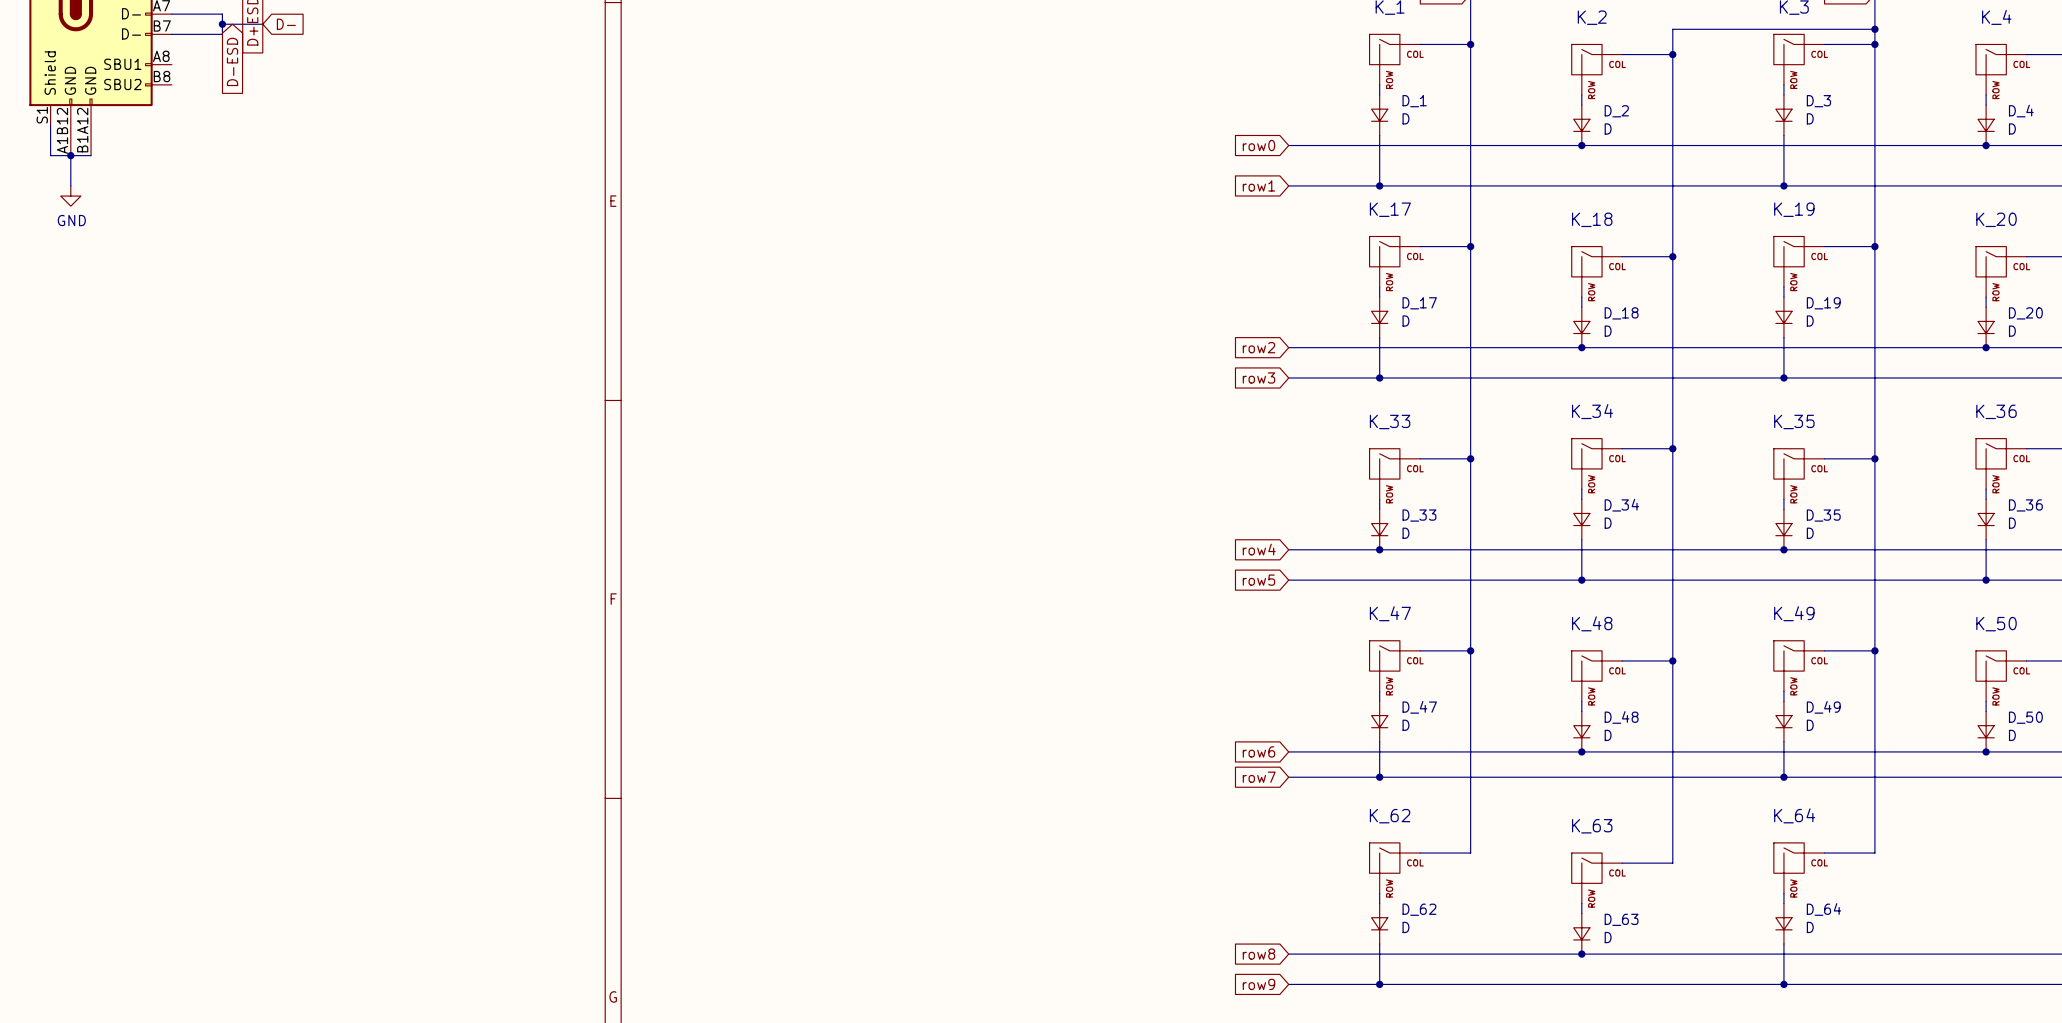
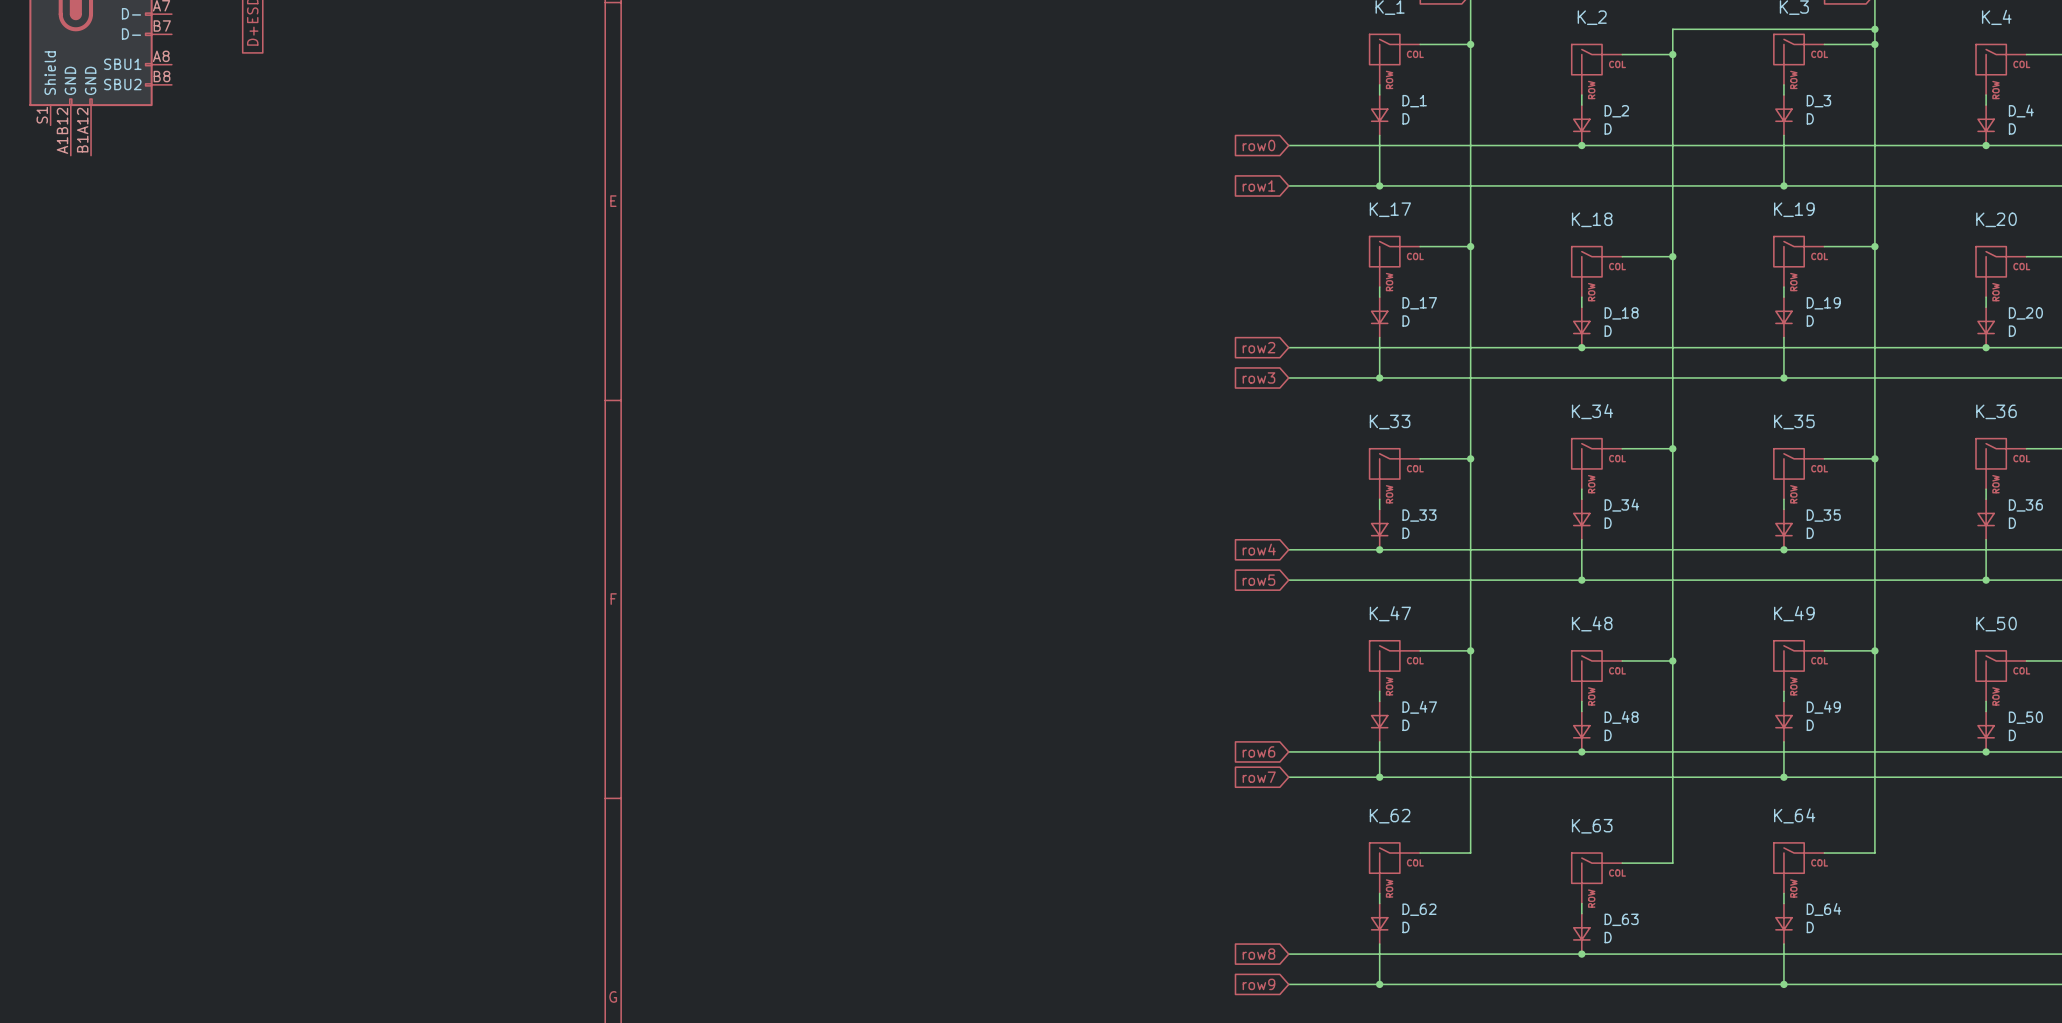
wire: (171, 14) (222, 14) (222, 34) (171, 34) -> none
wire: (222, 24) (262, 24) -> none
junction: (222, 24) -> none
global label: D- (286, 24) -> none
global label: D-ESD (232, 61) -> none
wire: (50, 125) (50, 155) (91, 155) -> none
wire: (70, 155) (70, 185) -> none
junction: (70, 155) -> none
power symbol: GND (70, 196) -> none

